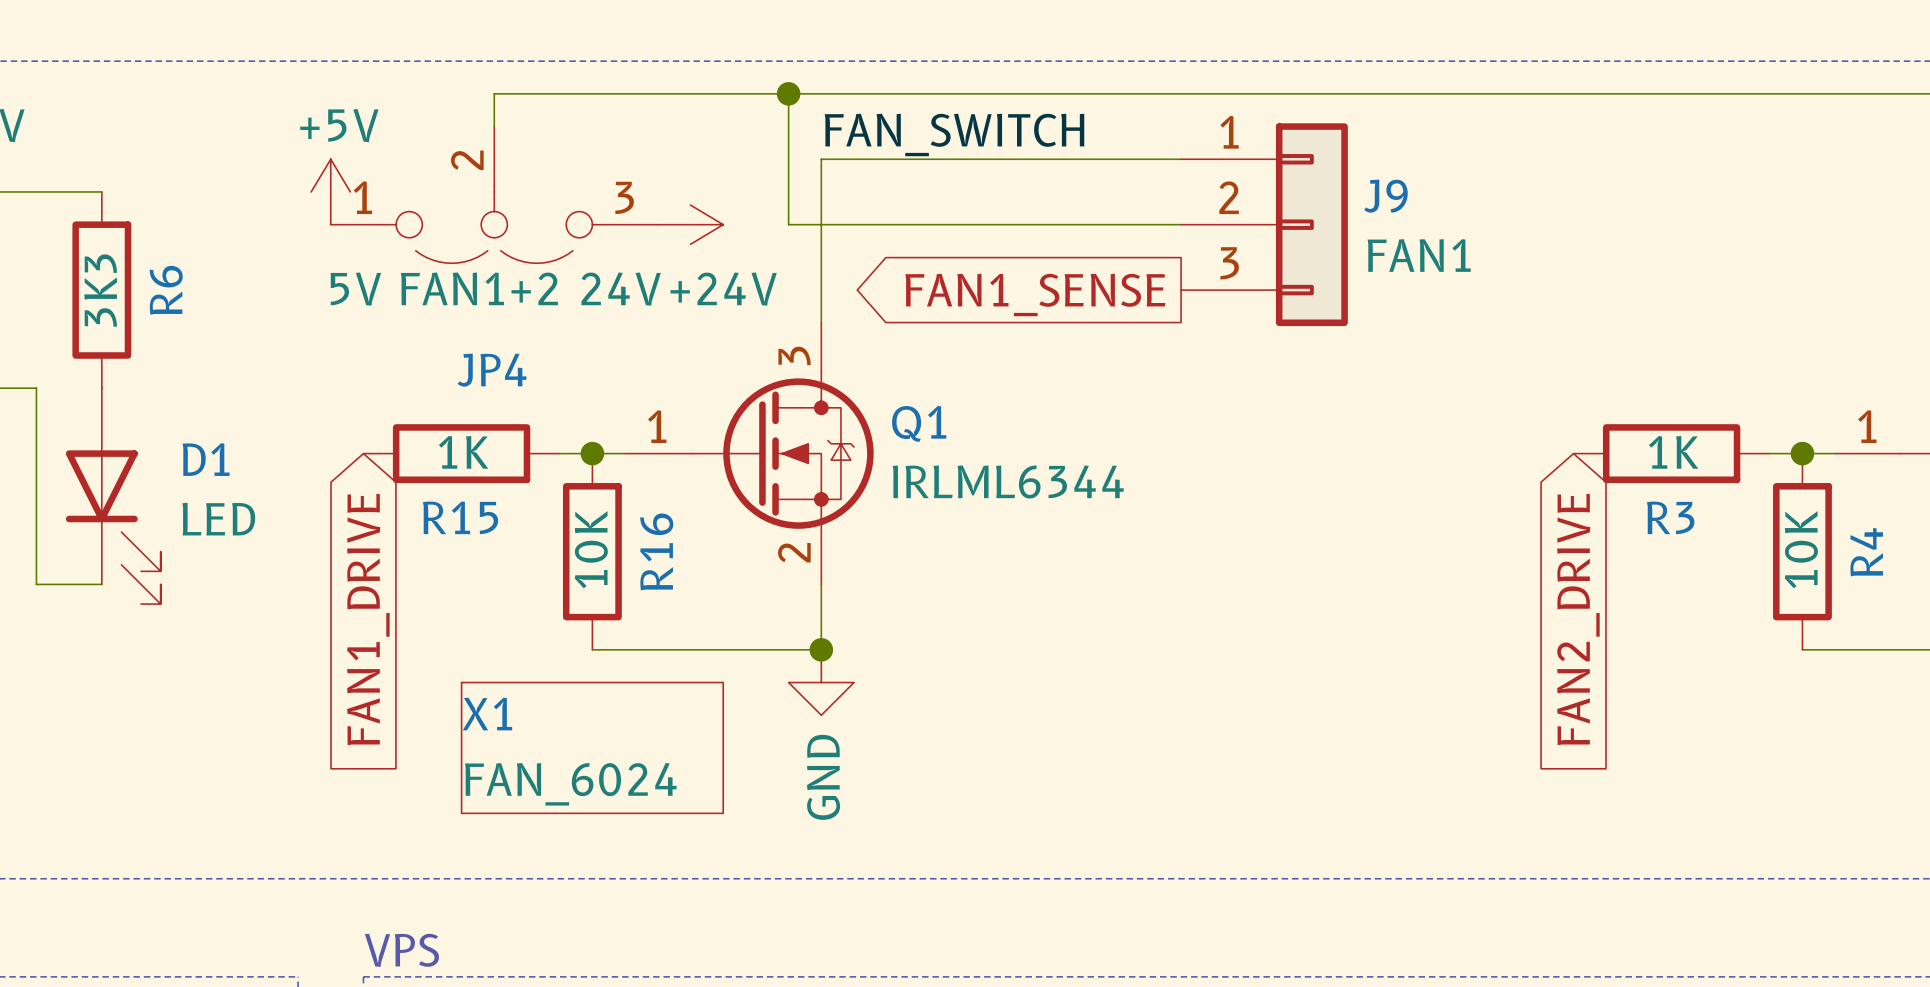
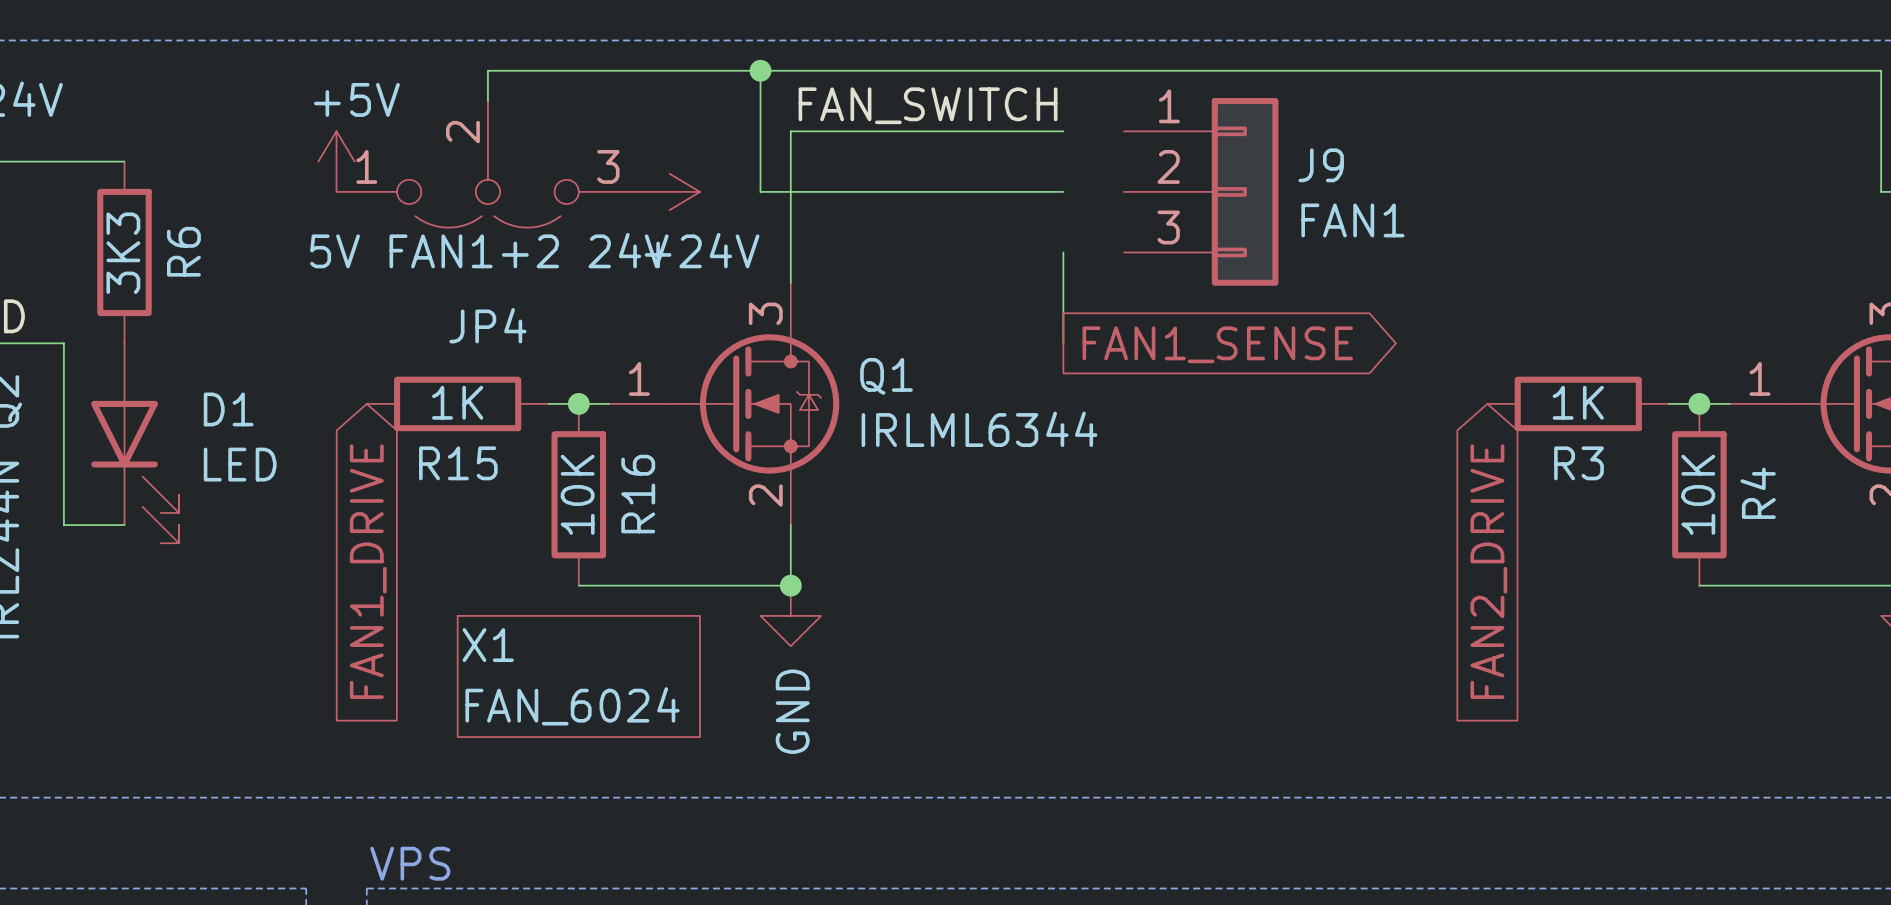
wire: (1115, 159) (1181, 159) -> none
wire: (1115, 224) (1181, 224) -> none
wire: none -> (1063, 252) (1063, 343)
global label rotation: 0° (1035, 294) -> 180° (1217, 344)

